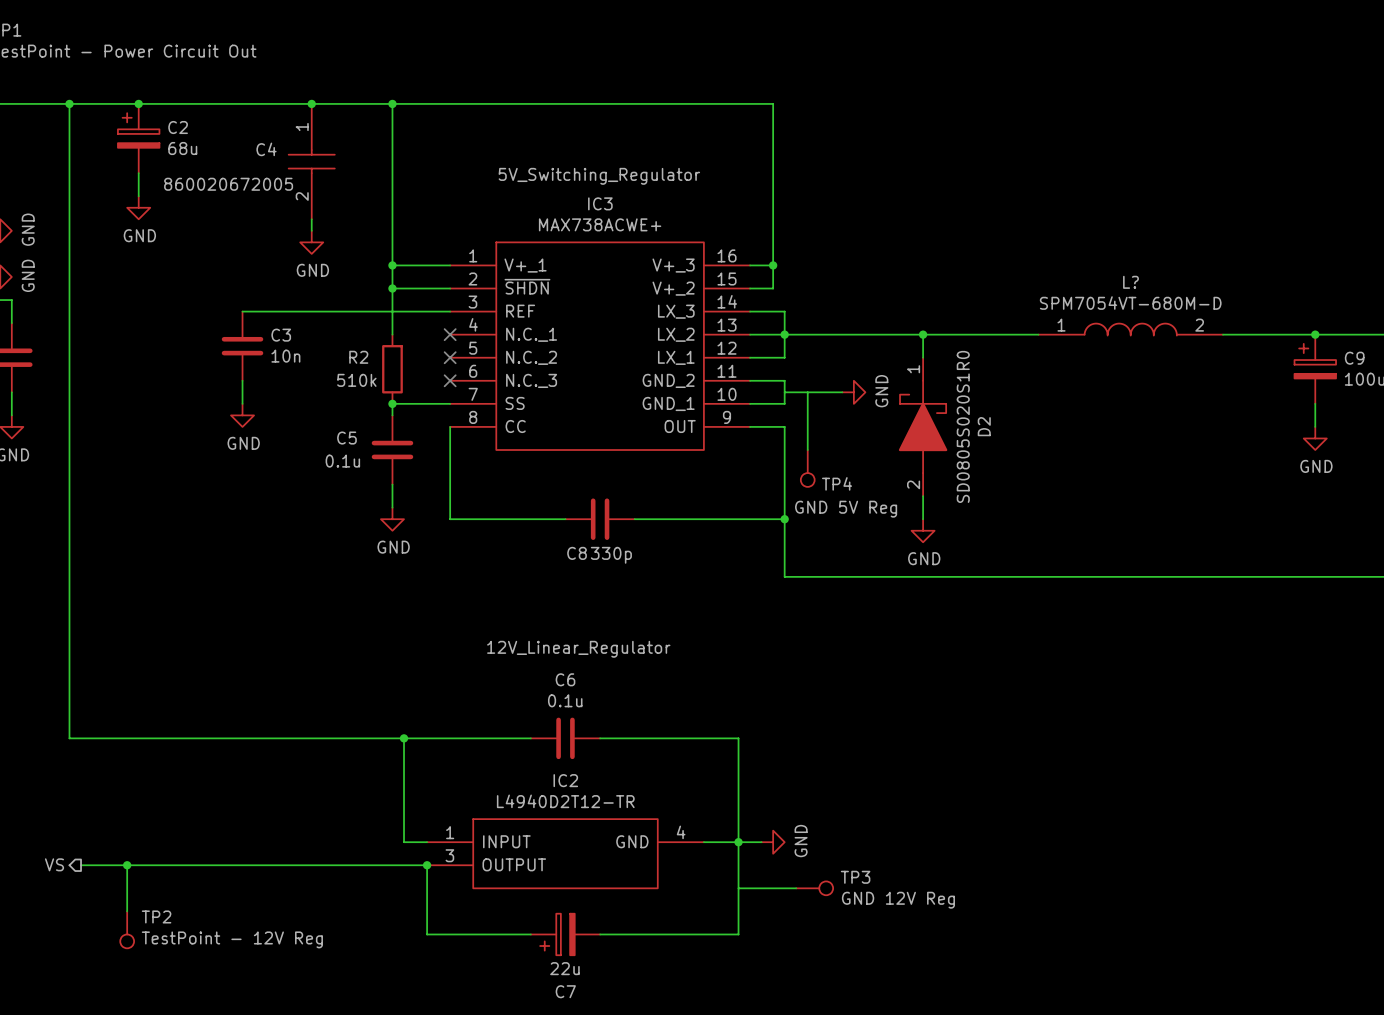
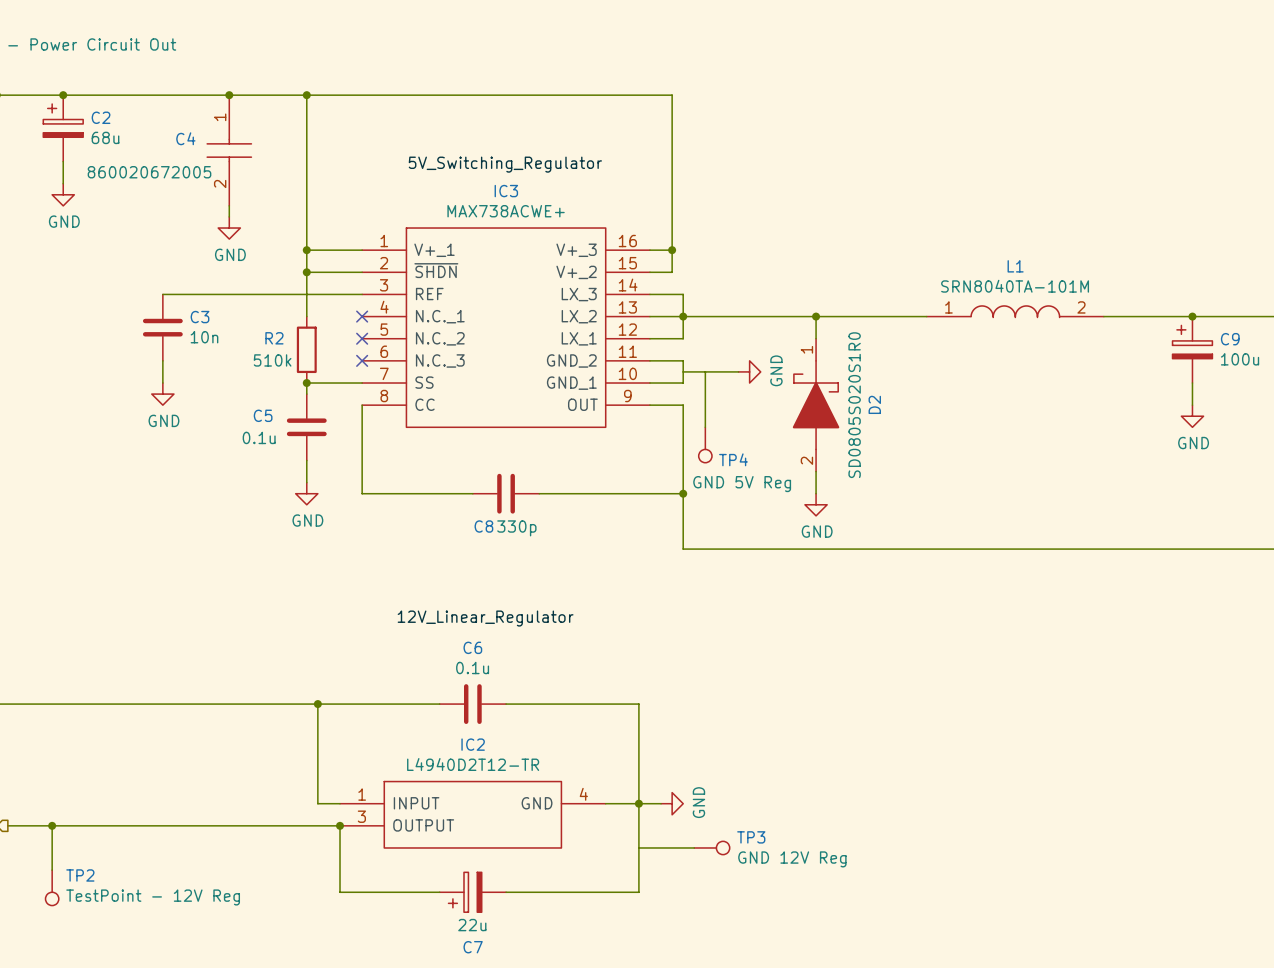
L? name: L? (1130, 282) -> L1 (1015, 266)
L? value: SPM7054VT-680M-D (1130, 303) -> SRN8040TA-101M (1015, 286)

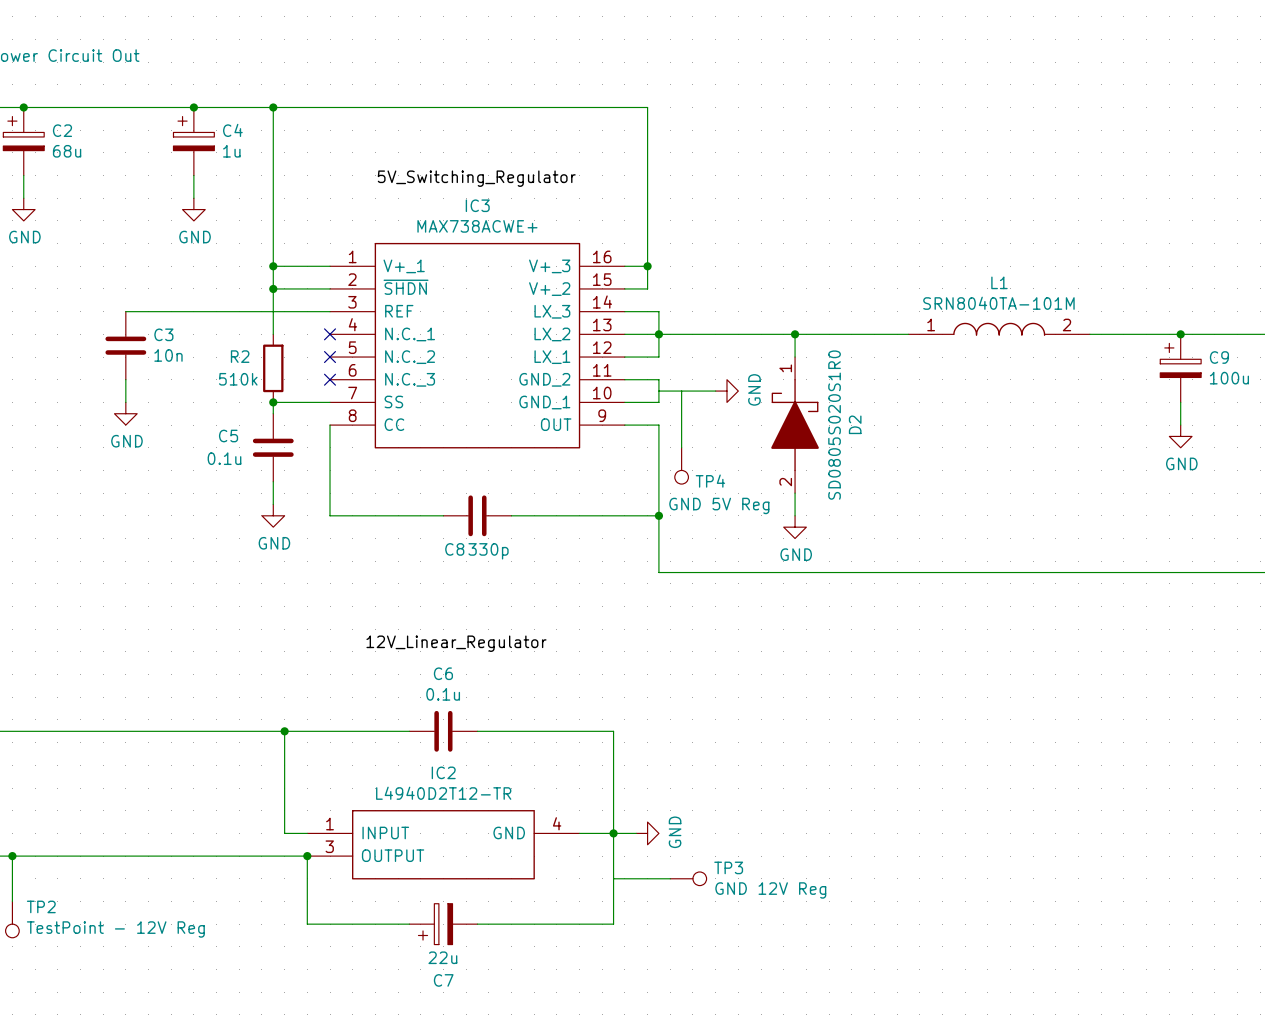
C4 symbol: [206, 95, 253, 206] -> [173, 107, 215, 176]
C4 name position: C4 (185, 138) -> C4 (232, 130)
C4 value: 860020672005 (149, 172) -> 1u (231, 151)
wire: (229, 205) (229, 216) -> none
power symbol position: GND (229, 228) -> GND (193, 209)

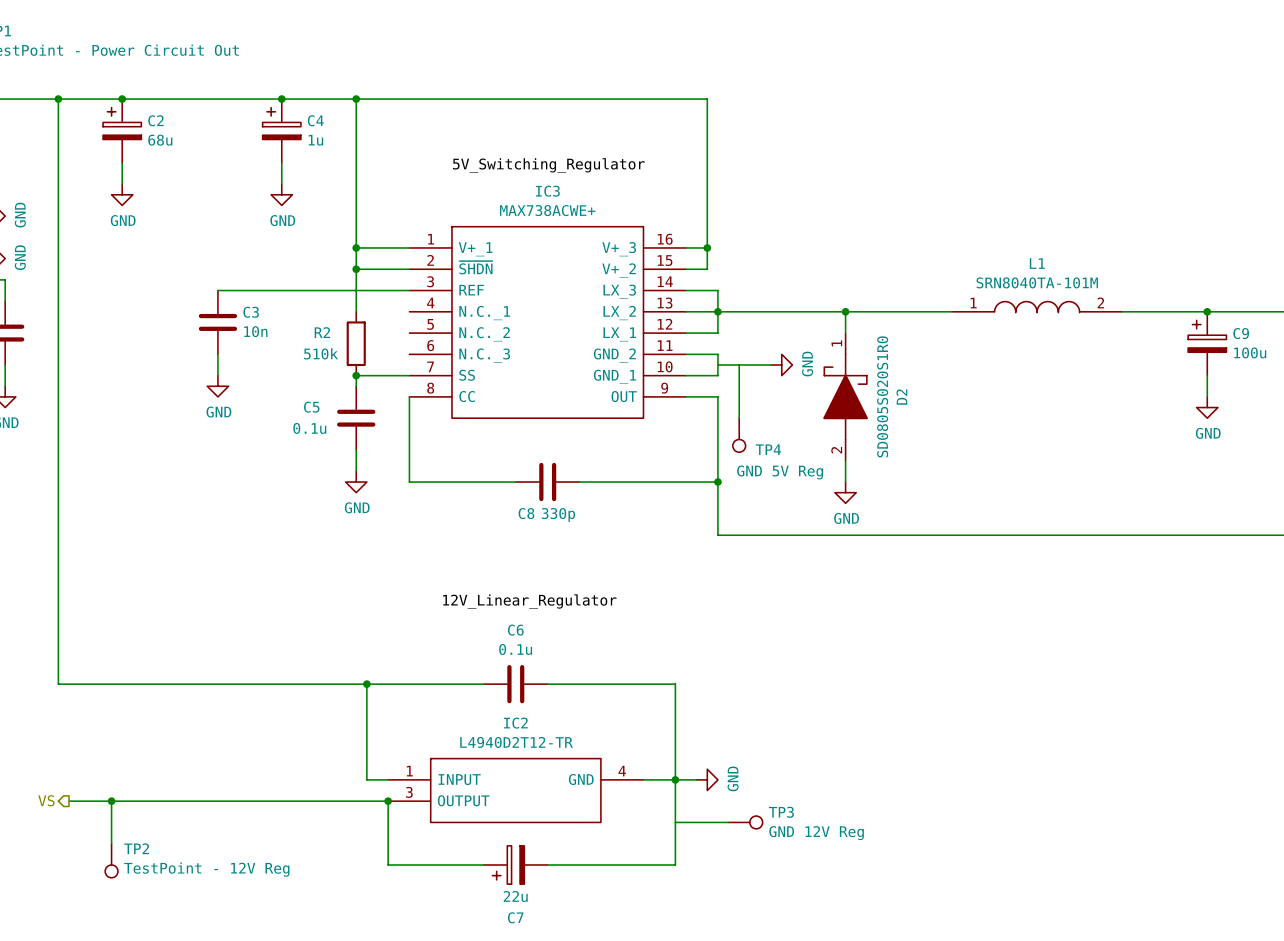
no-connect mark: (330, 334) -> none
no-connect mark: (330, 357) -> none
no-connect mark: (330, 379) -> none

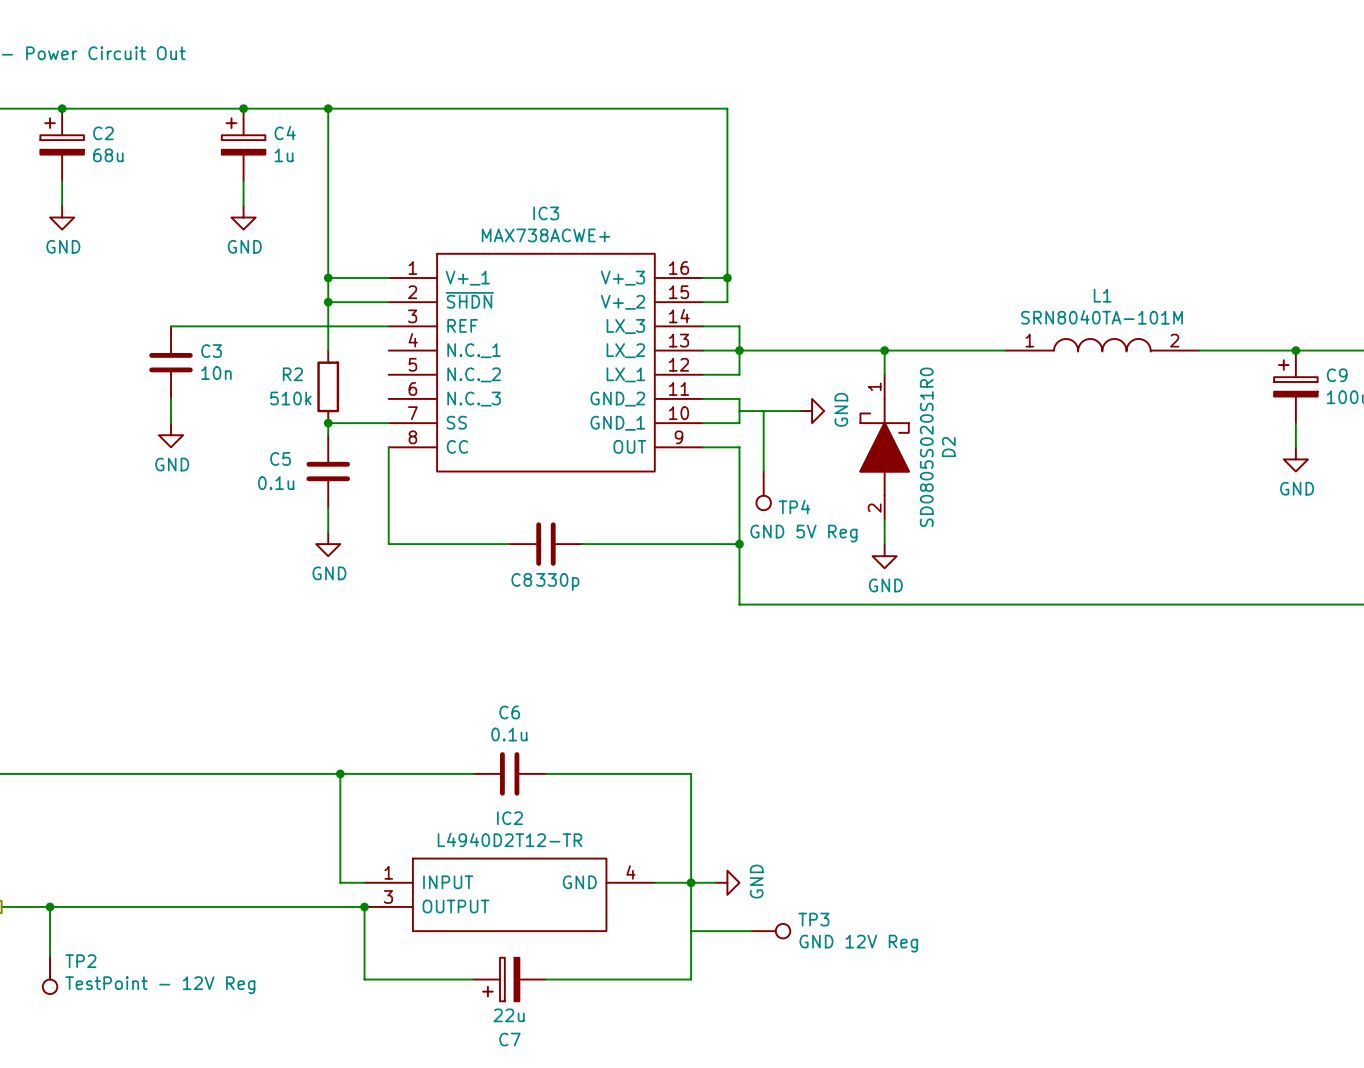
label: 5V_Switching_Regulator (548, 165) -> none
label: 12V_Linear_Regulator (529, 601) -> none

